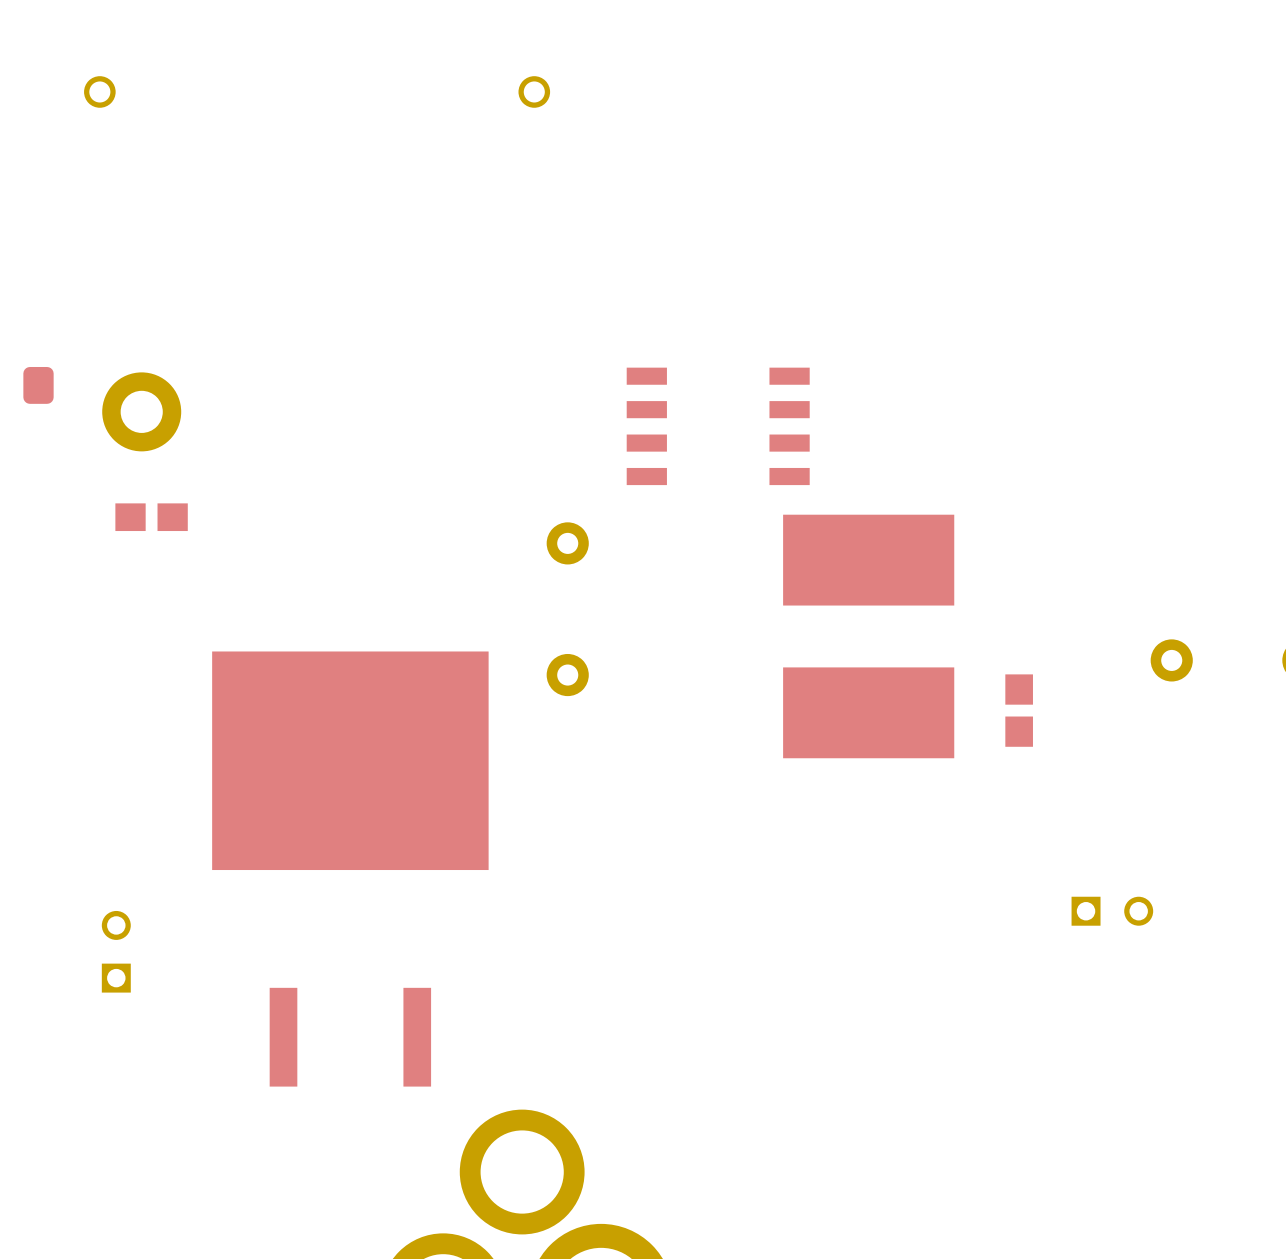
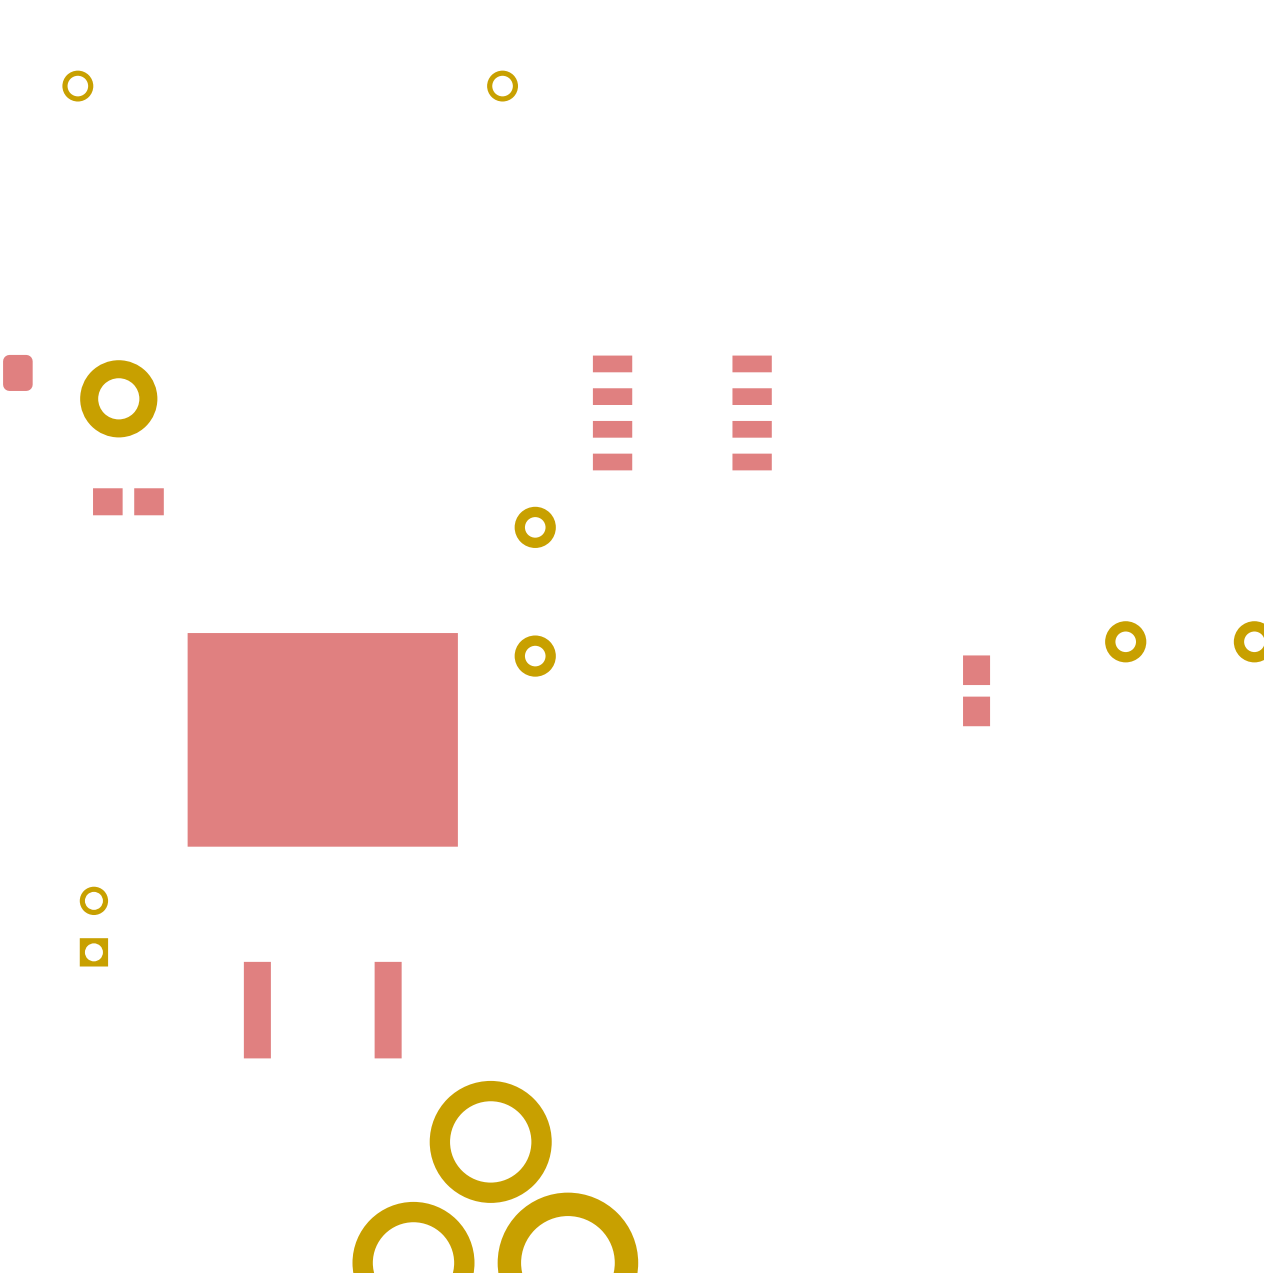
part: (868, 636) -> none
part: (1112, 911) -> none

